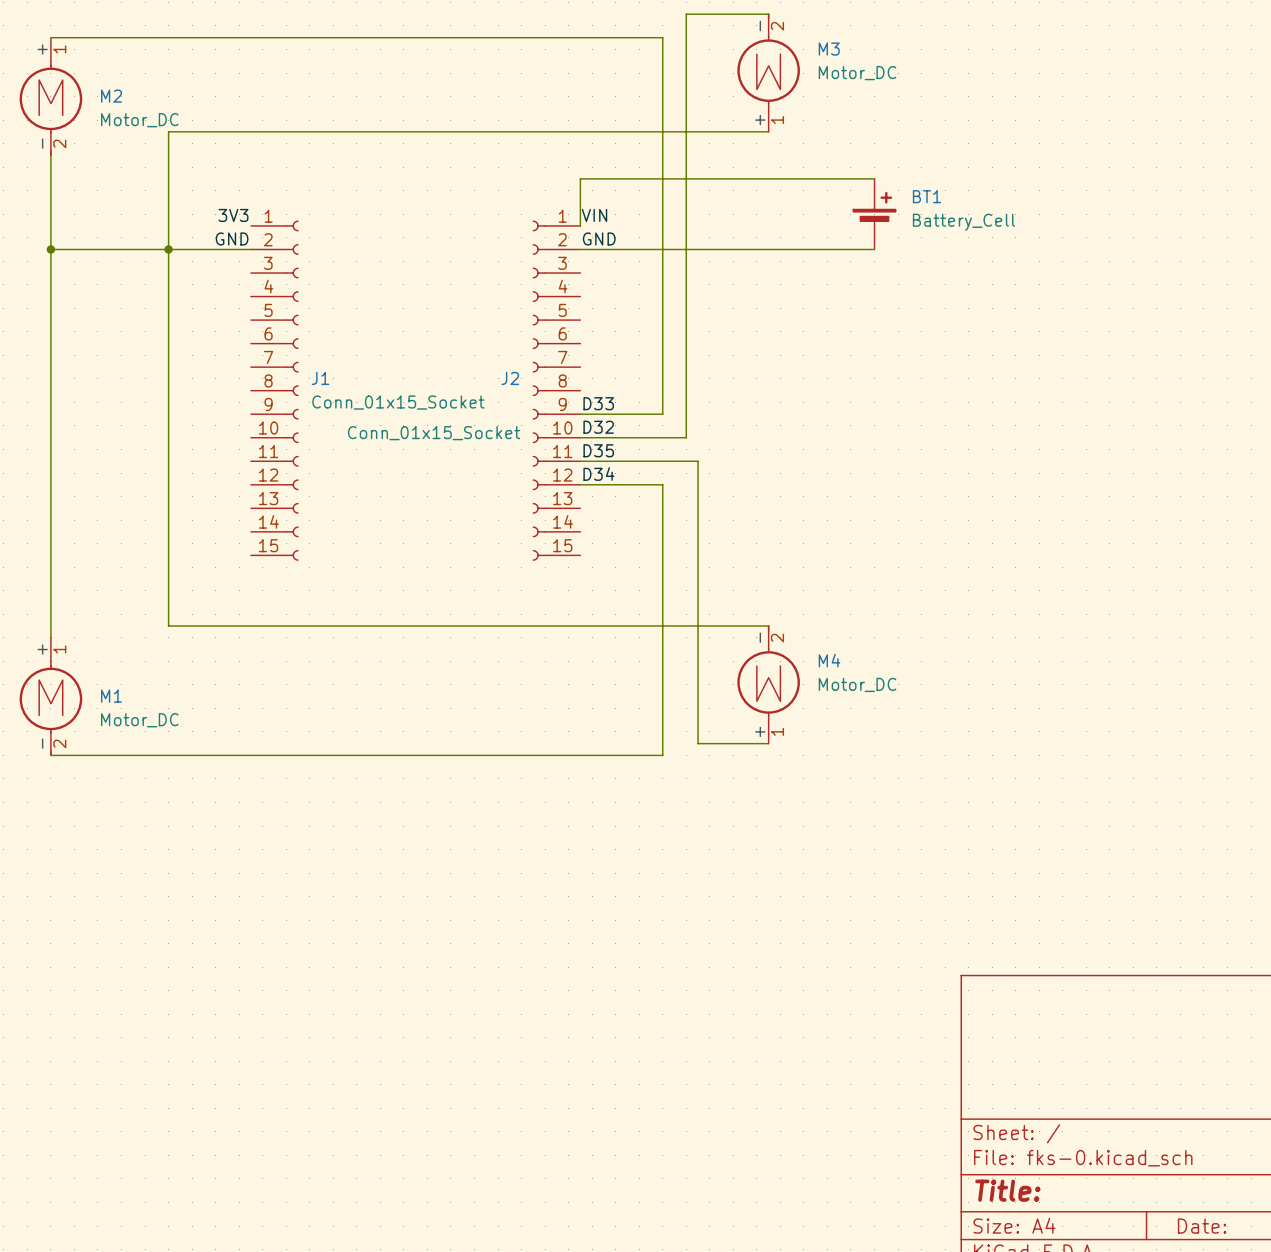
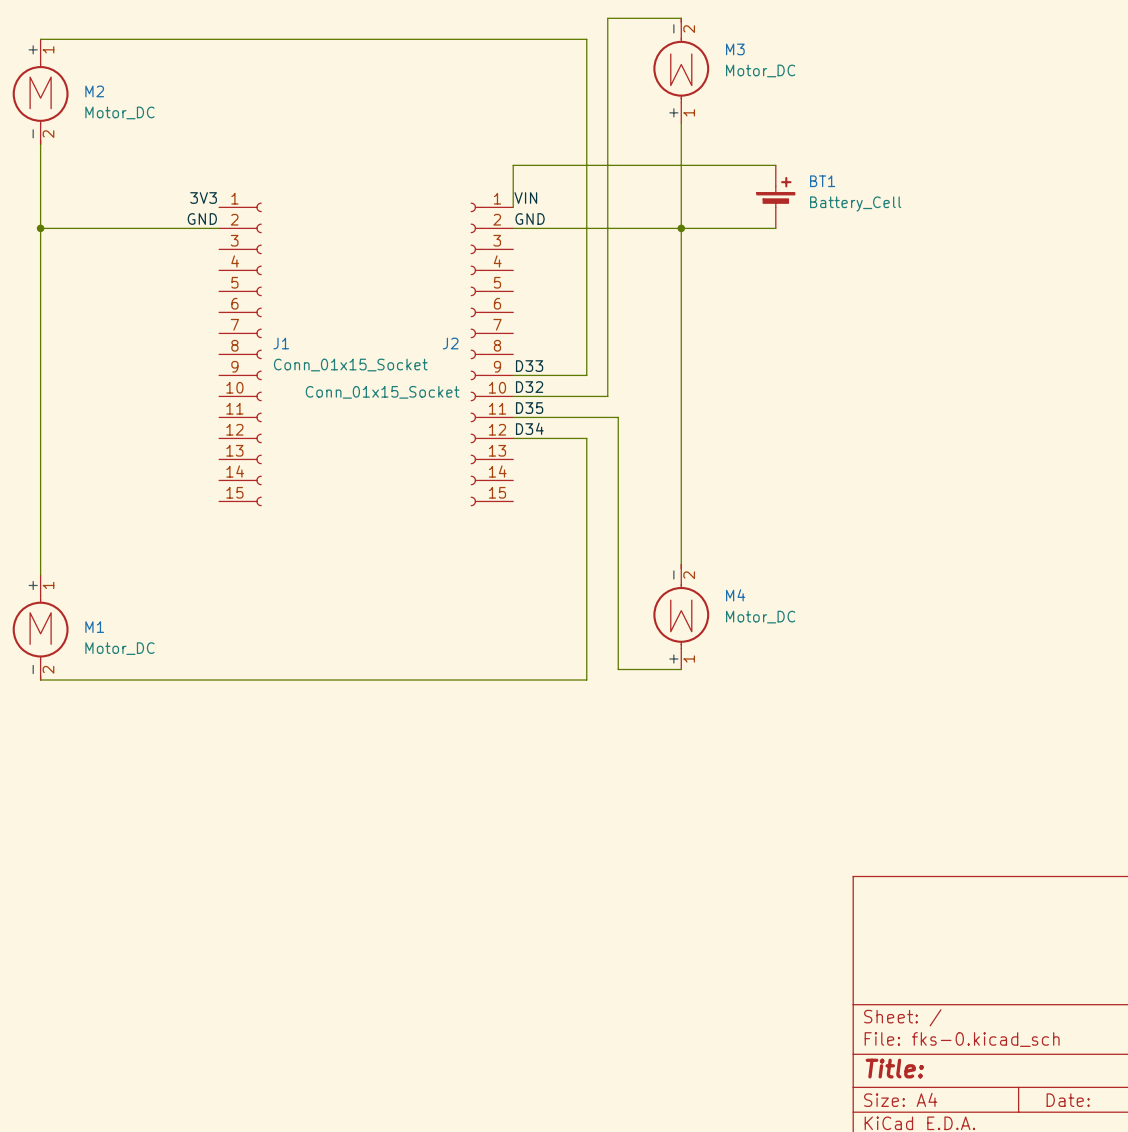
wire: (768, 131) (168, 131) (168, 625) (768, 625) -> (681, 123) (681, 564)
junction: (168, 249) -> none
junction: none -> (681, 228)

